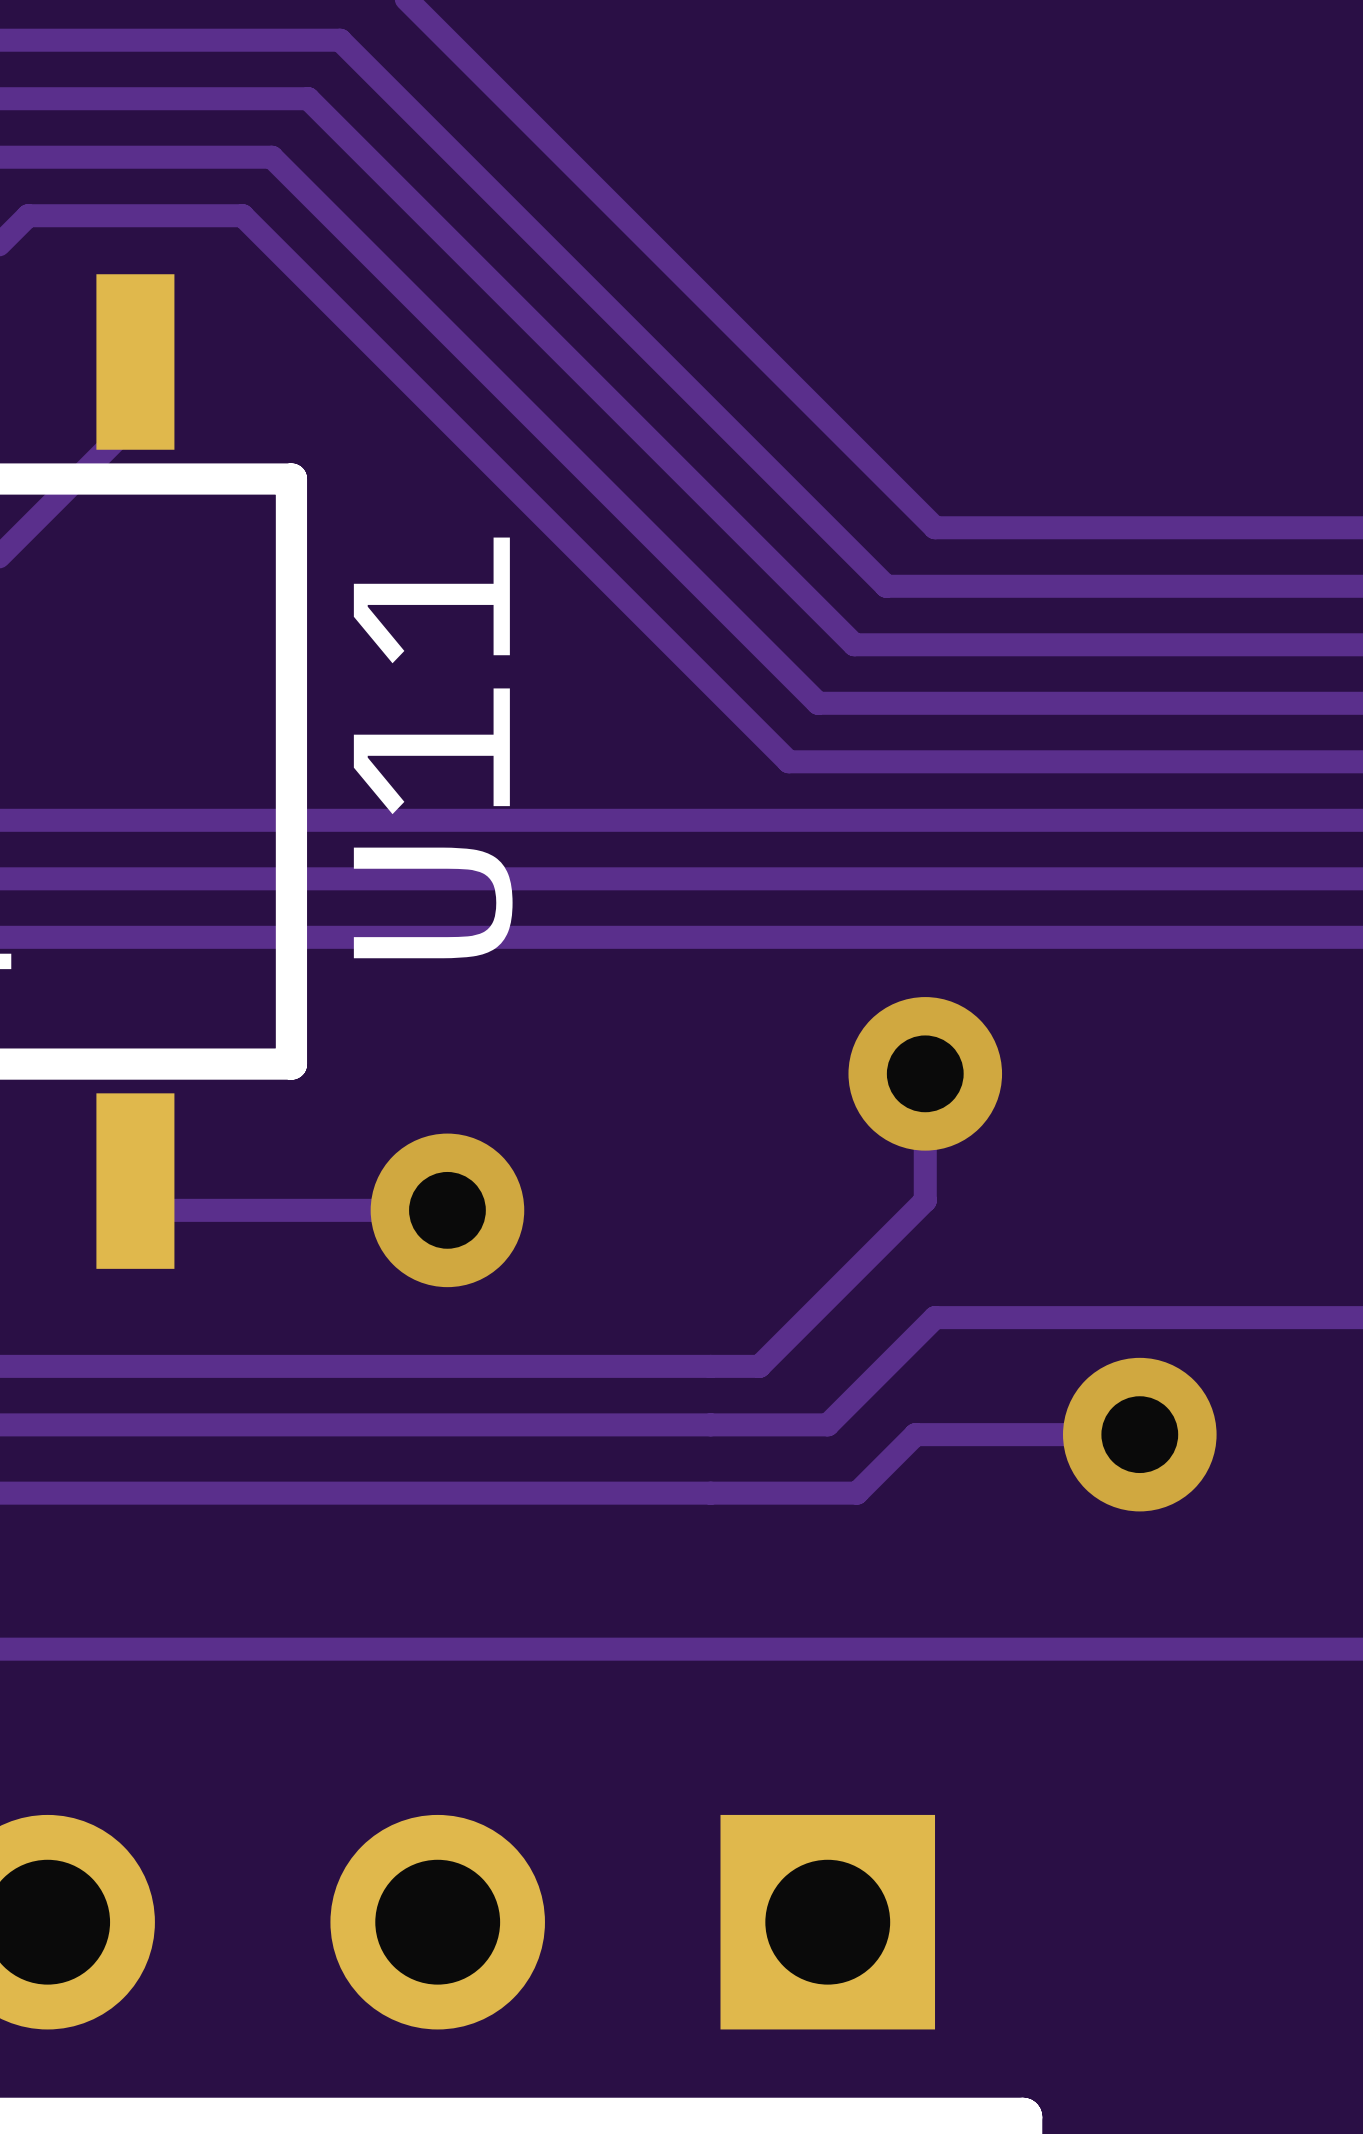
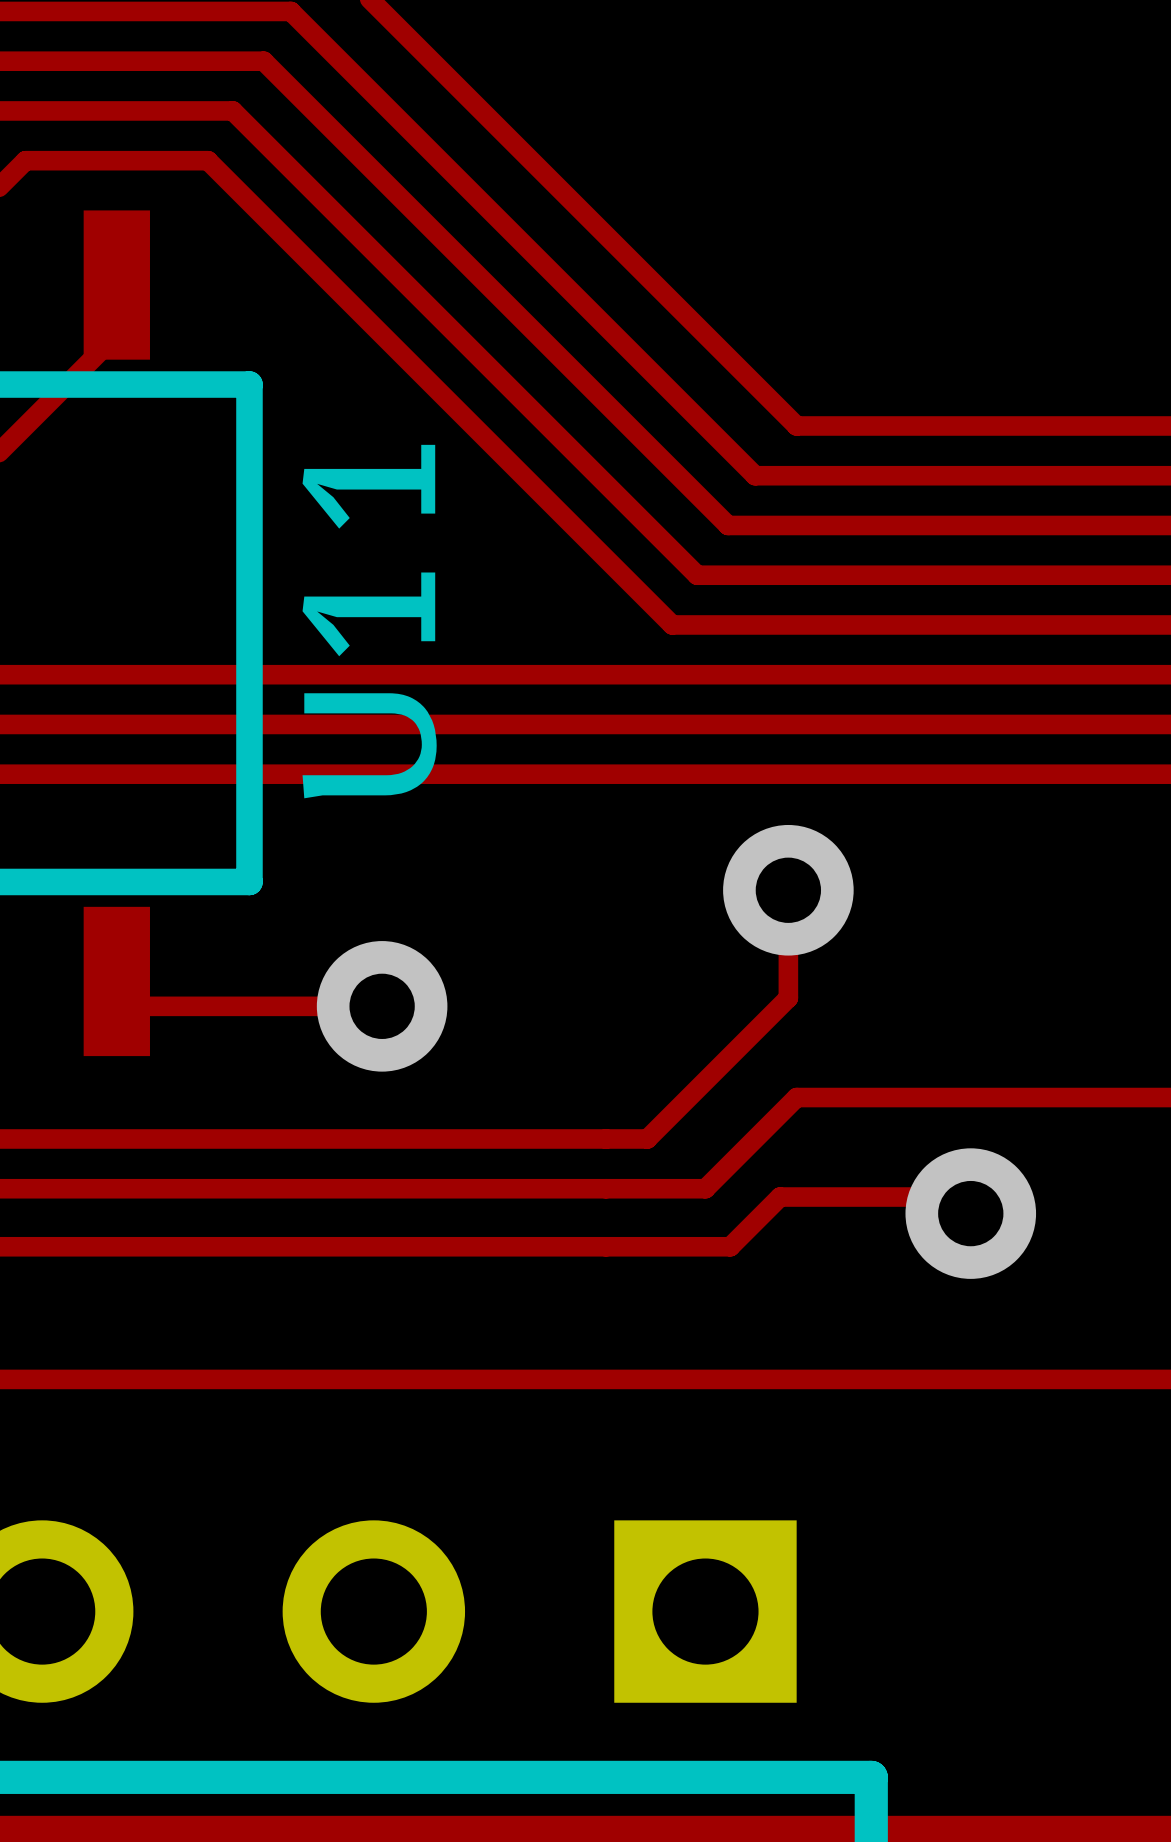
via position: (1139, 1434) -> (970, 1213)

